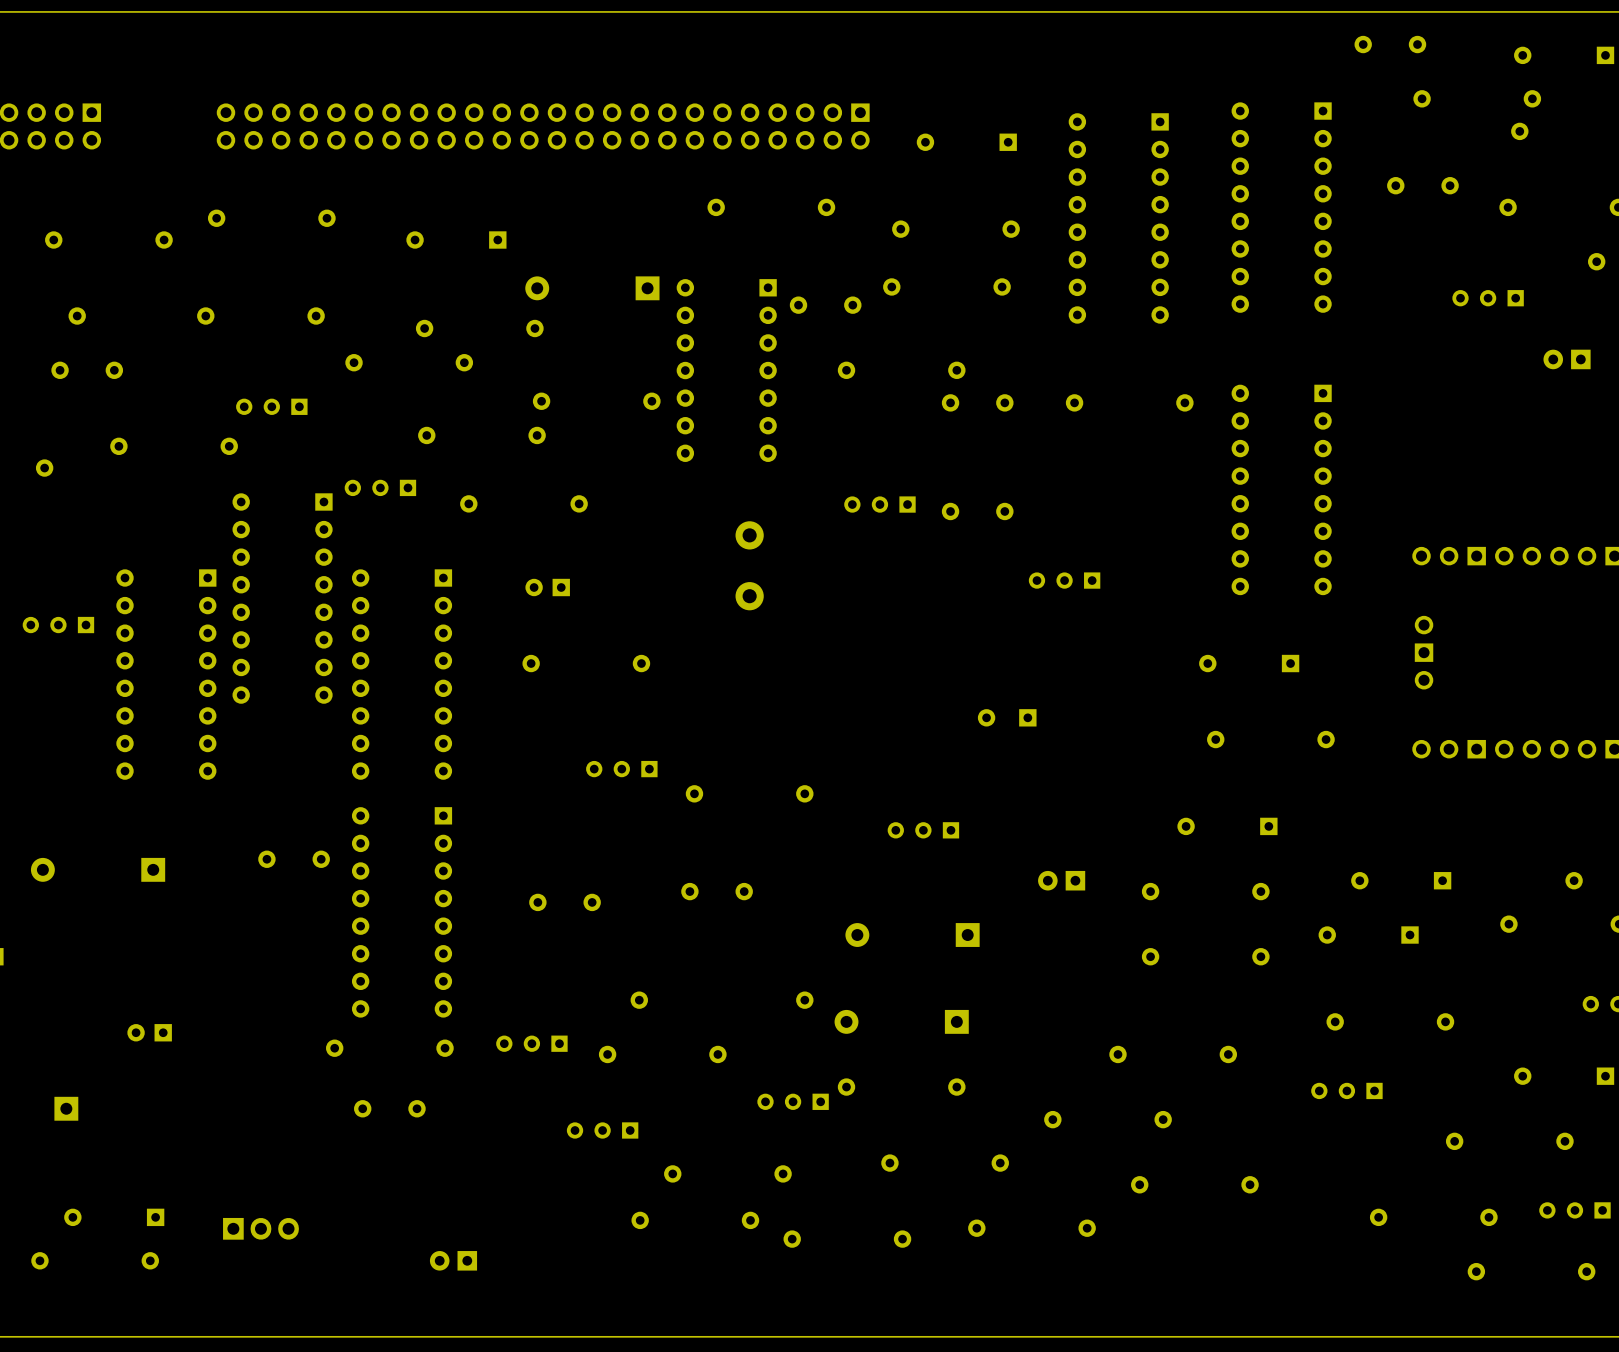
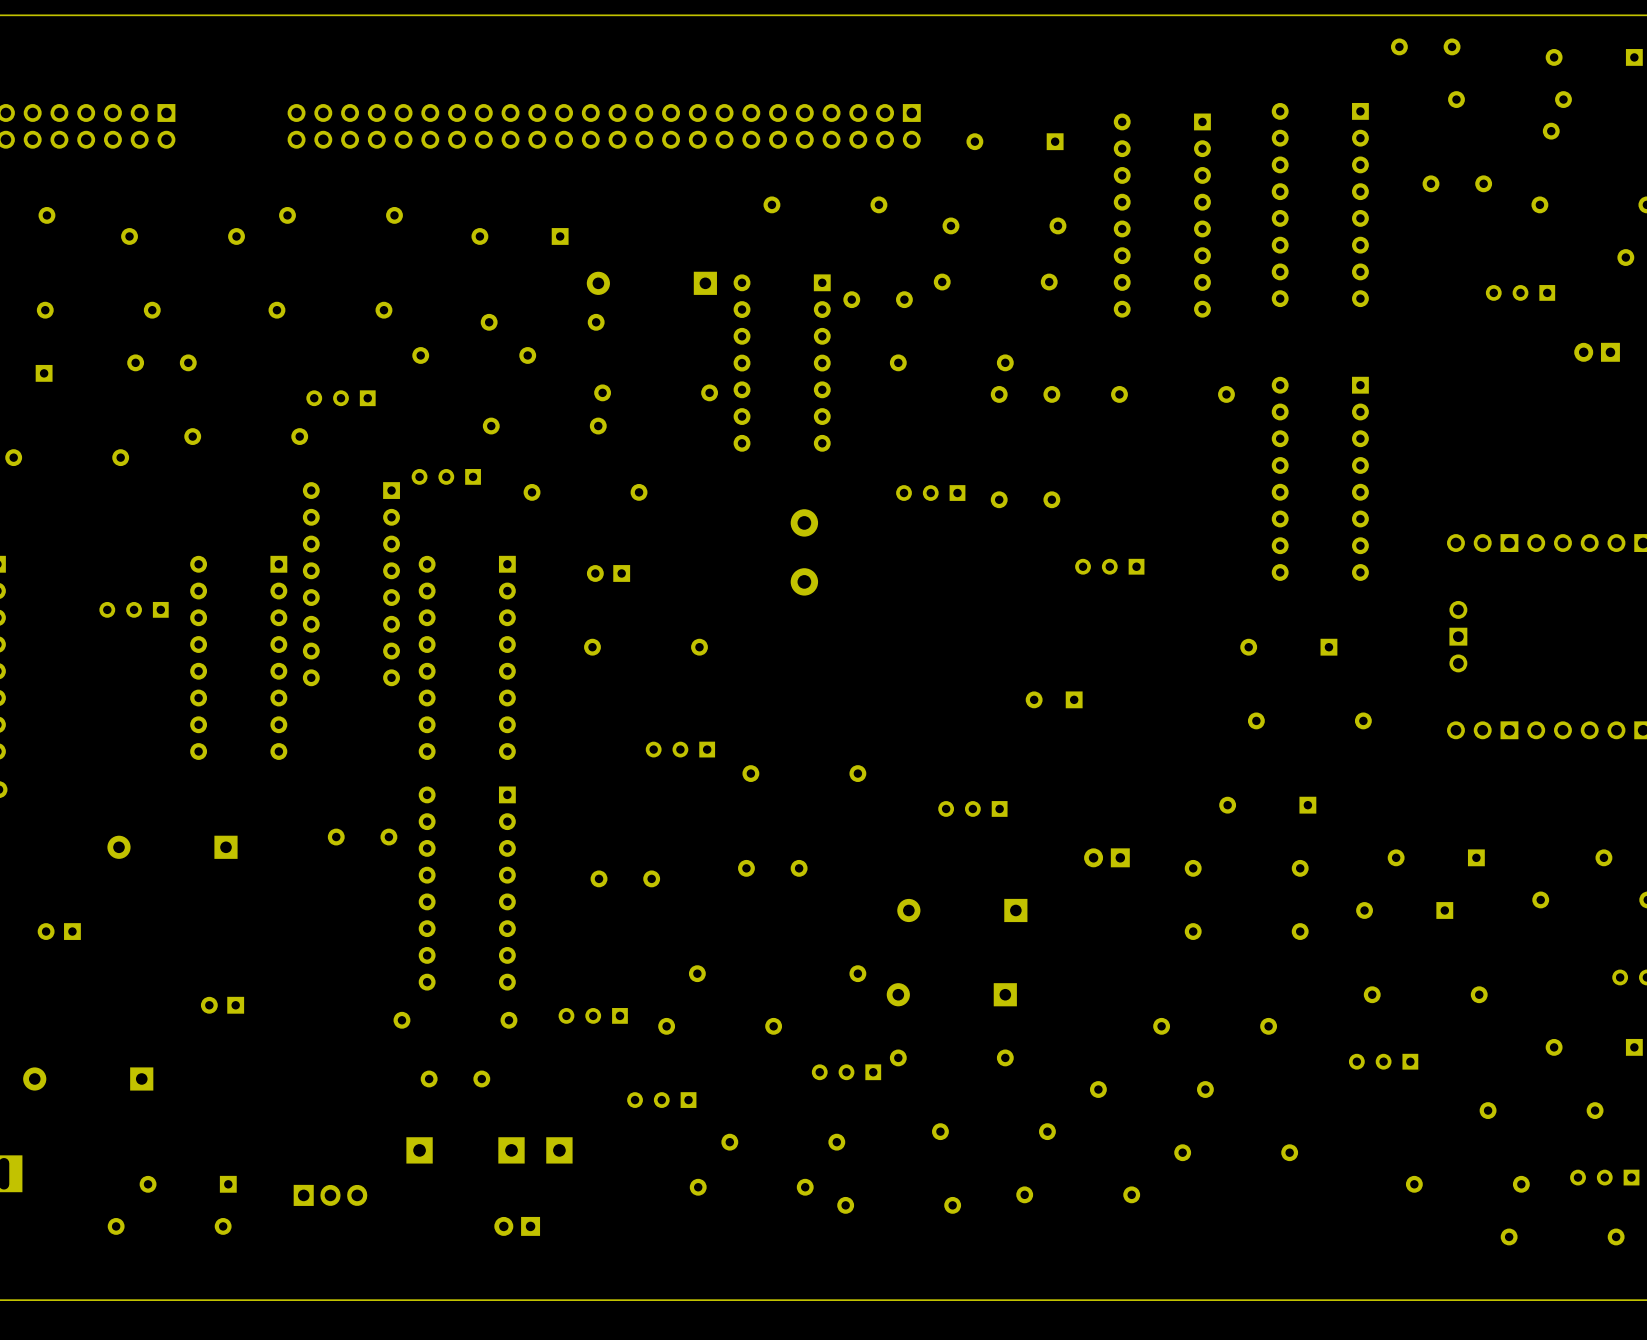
part: none -> (419, 1150)
part: none -> (511, 1150)
part: none -> (559, 1150)

